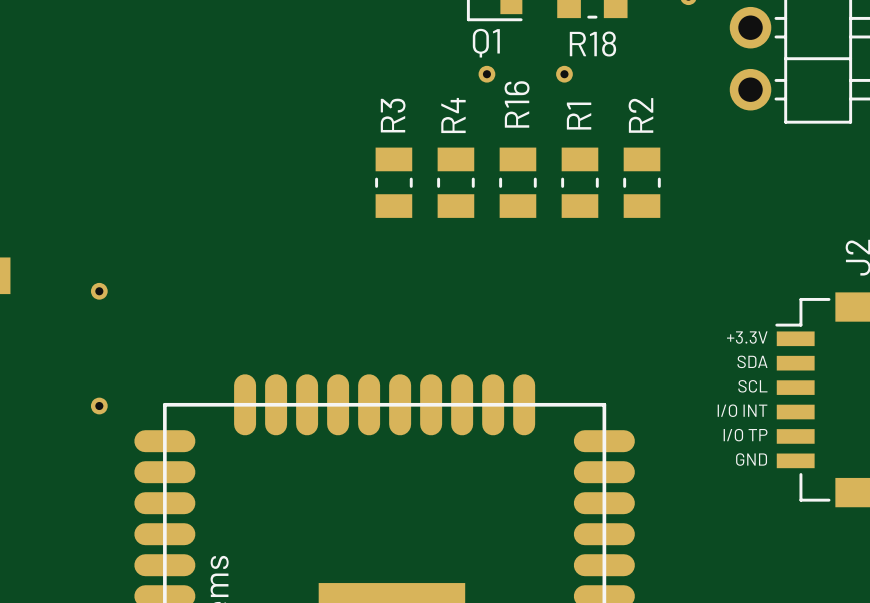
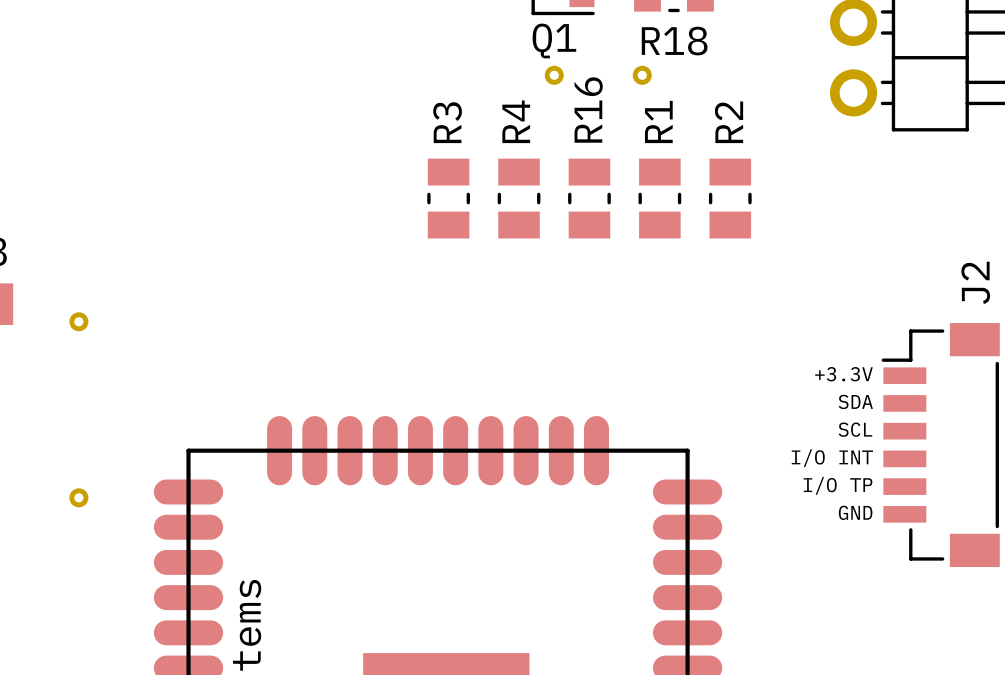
part position: (99, 291) -> (78, 321)
part position: (99, 406) -> (78, 497)

